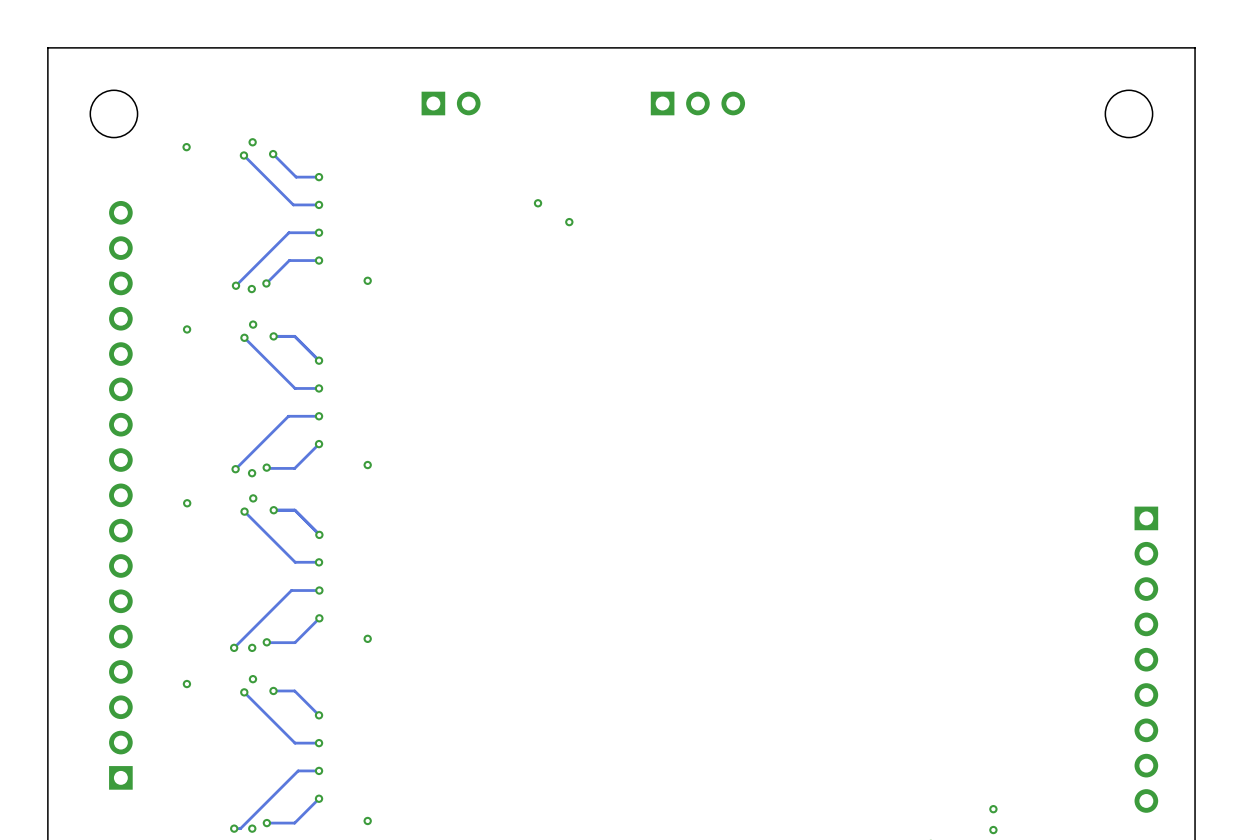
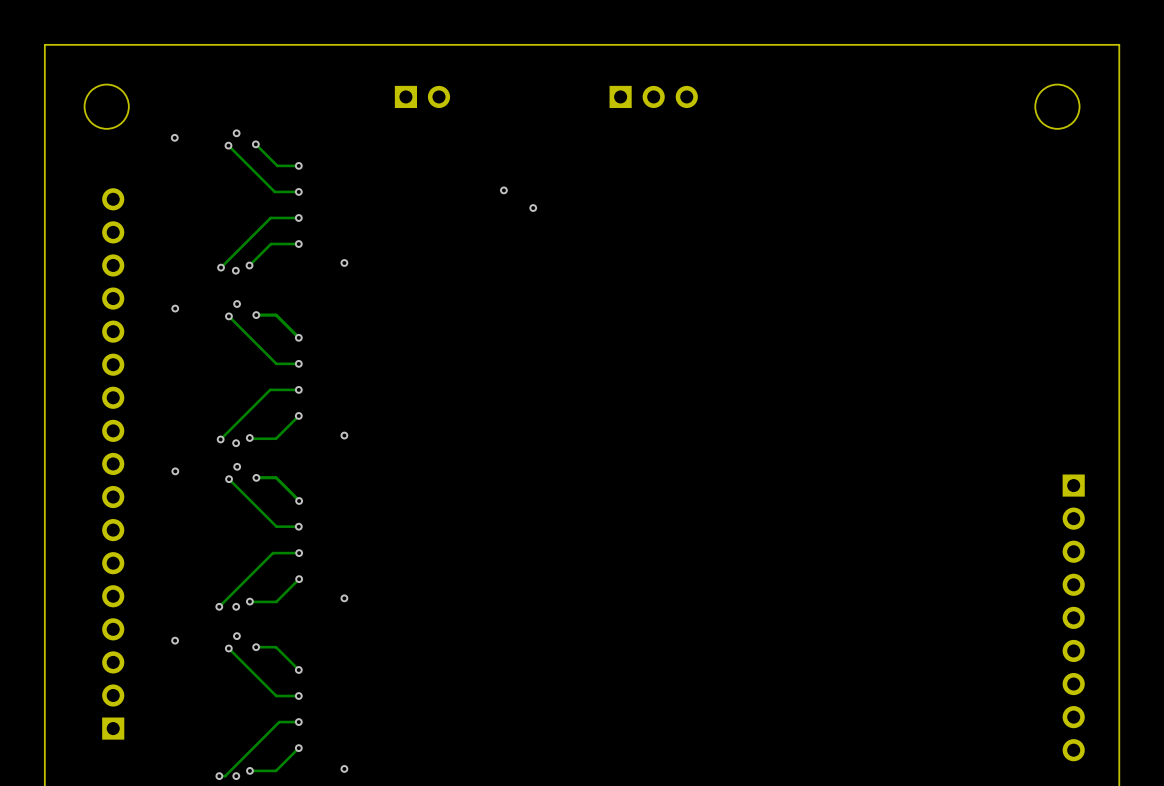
via: (993, 809) -> none
via: (993, 830) -> none

